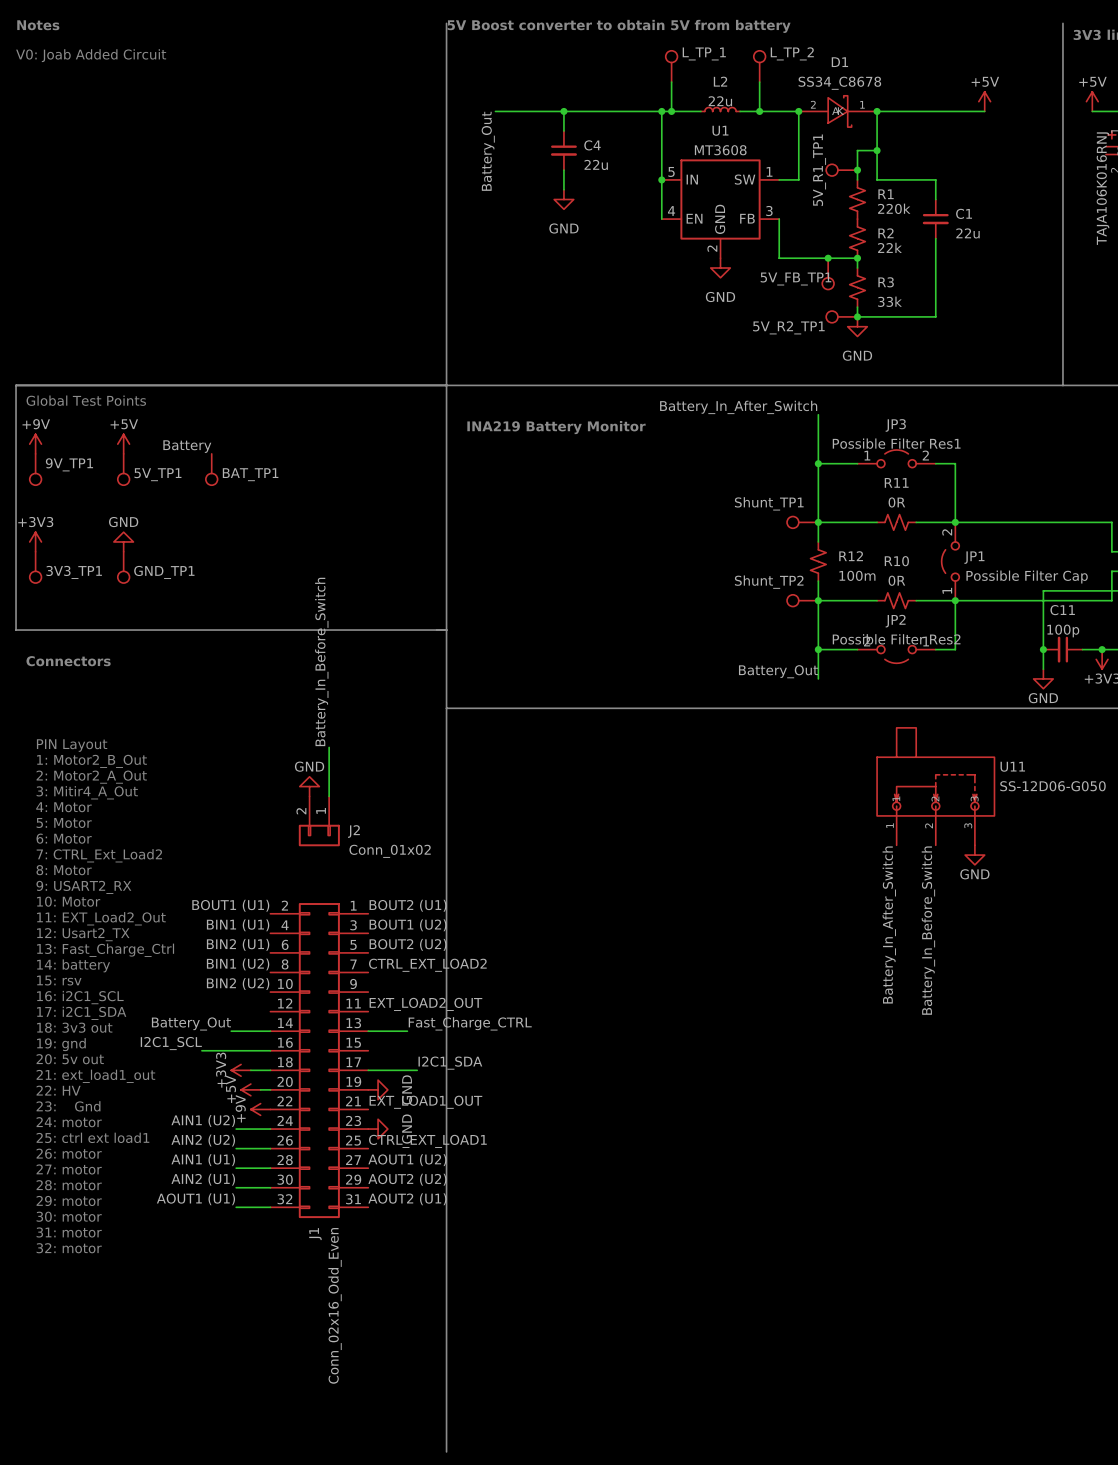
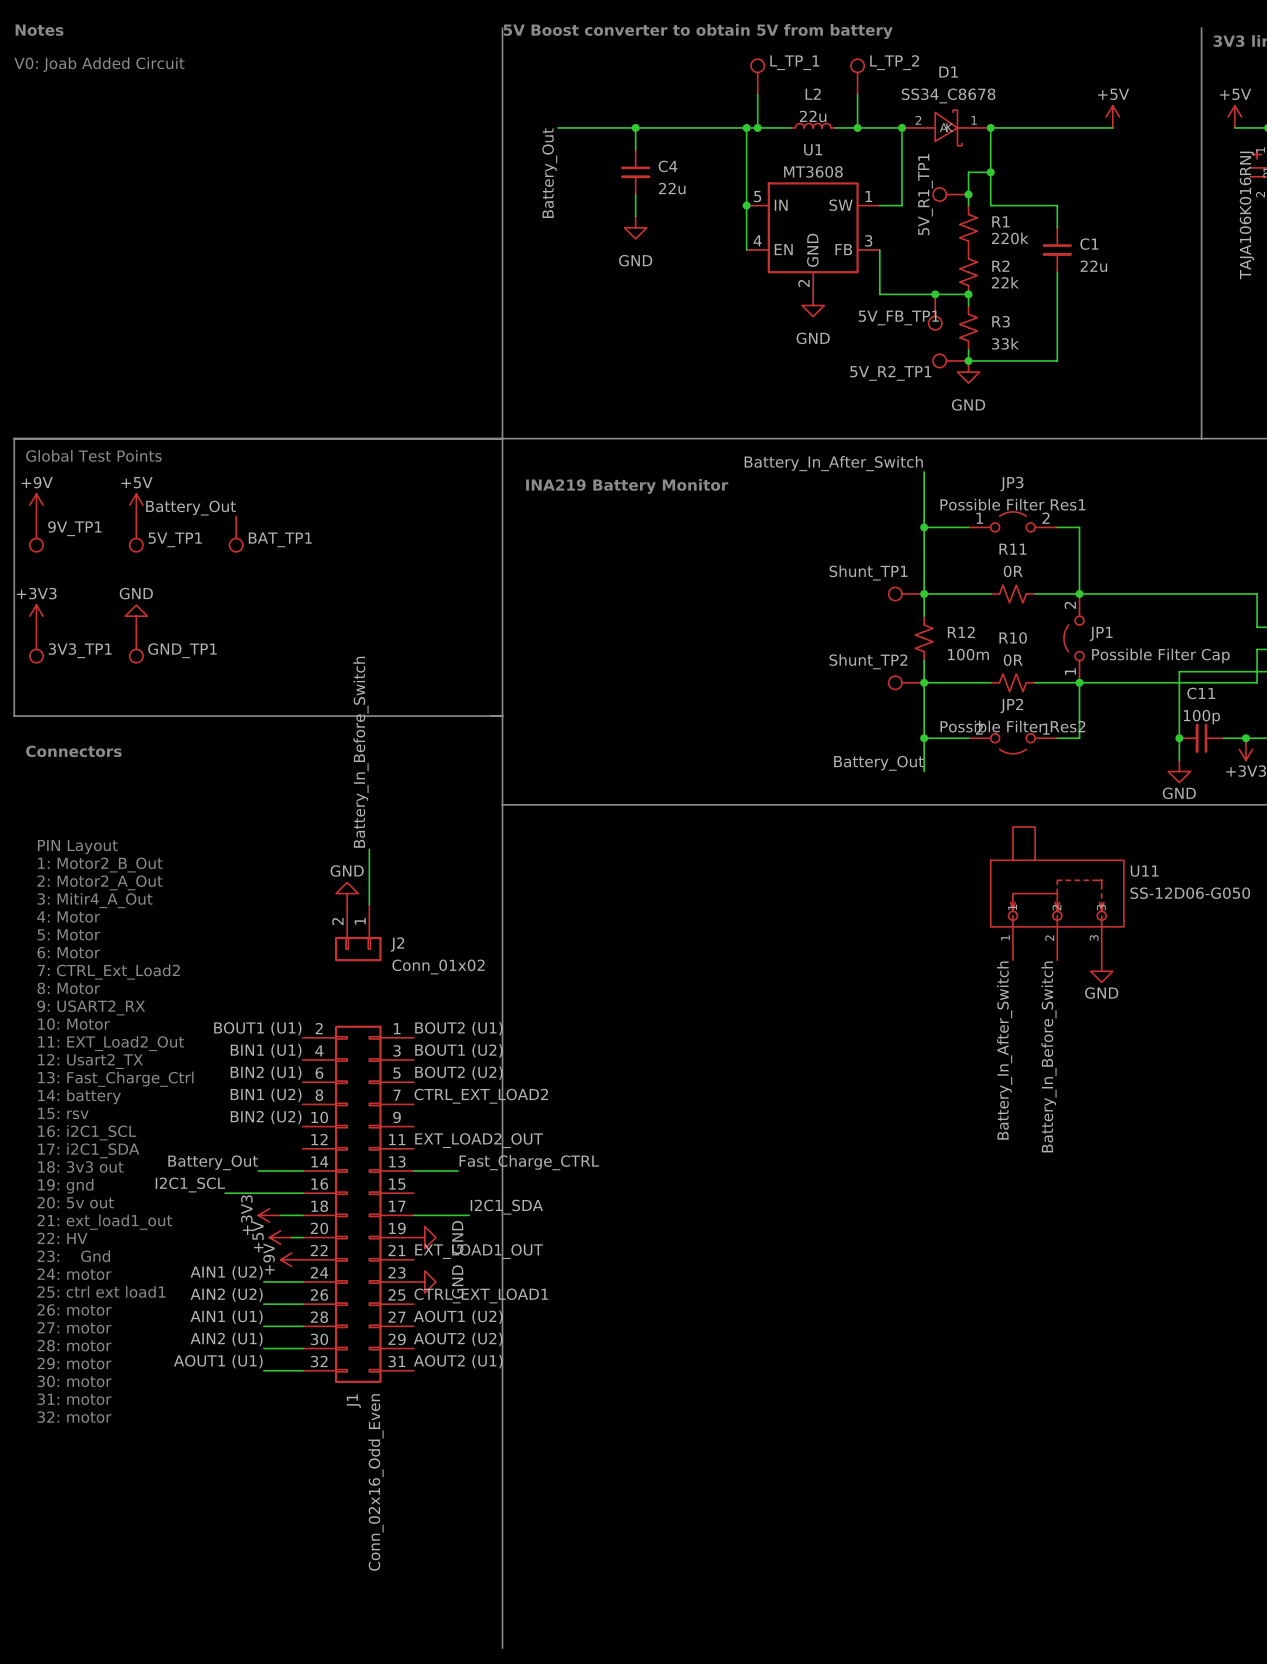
label: Battery (187, 446) -> Battery_Out (190, 508)

